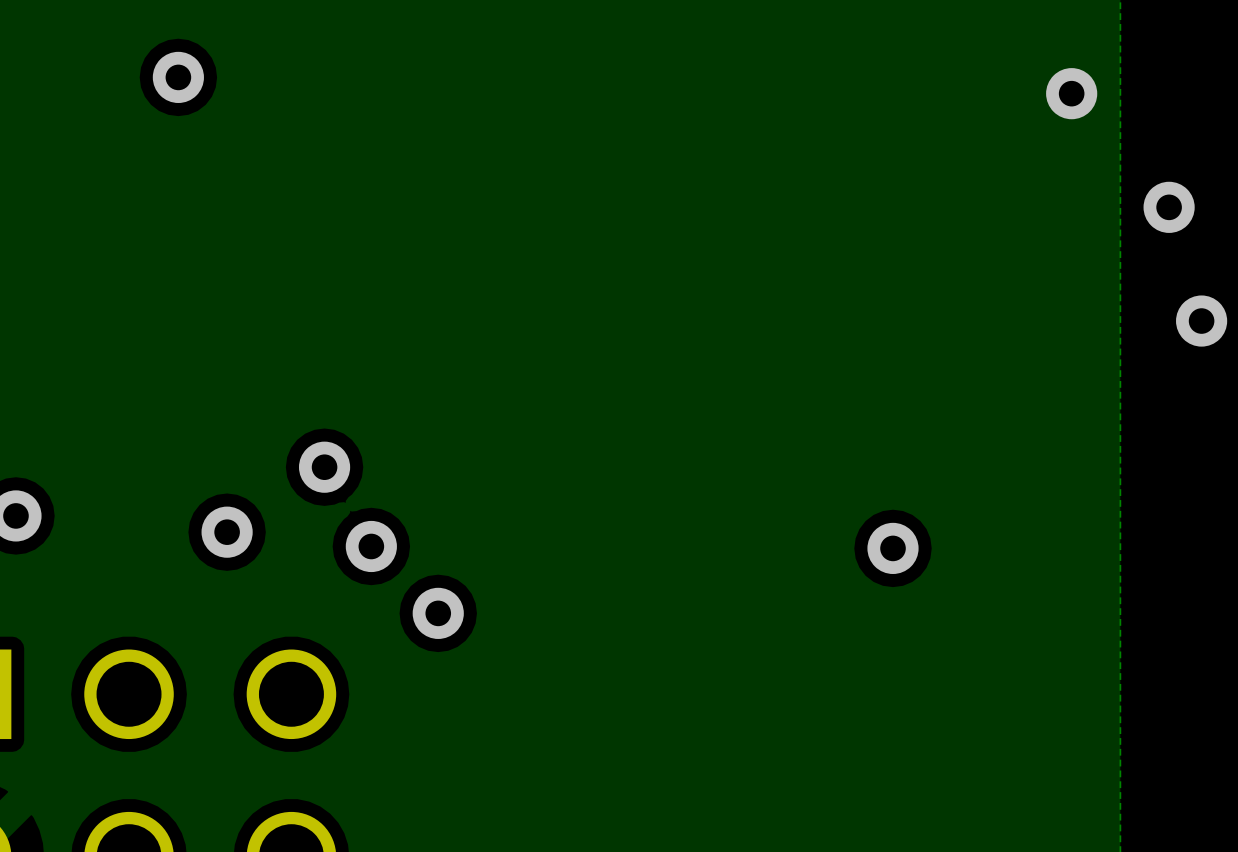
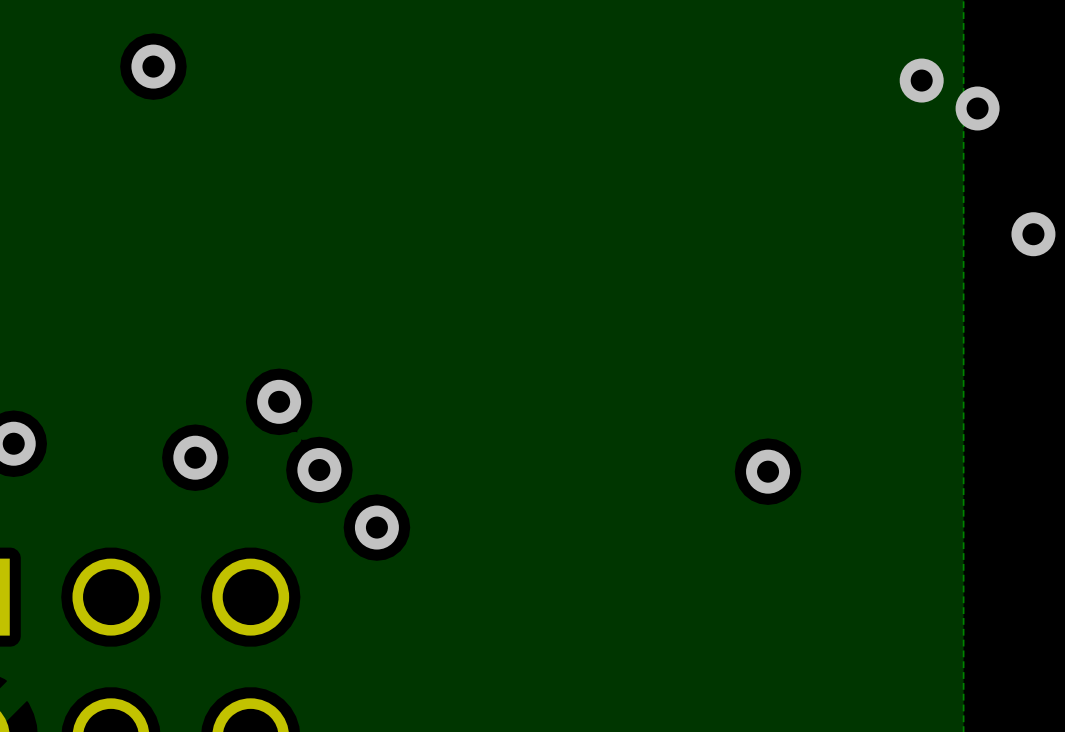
via: none -> (977, 108)
via: (1169, 207) -> none
via position: (1201, 321) -> (1033, 234)

